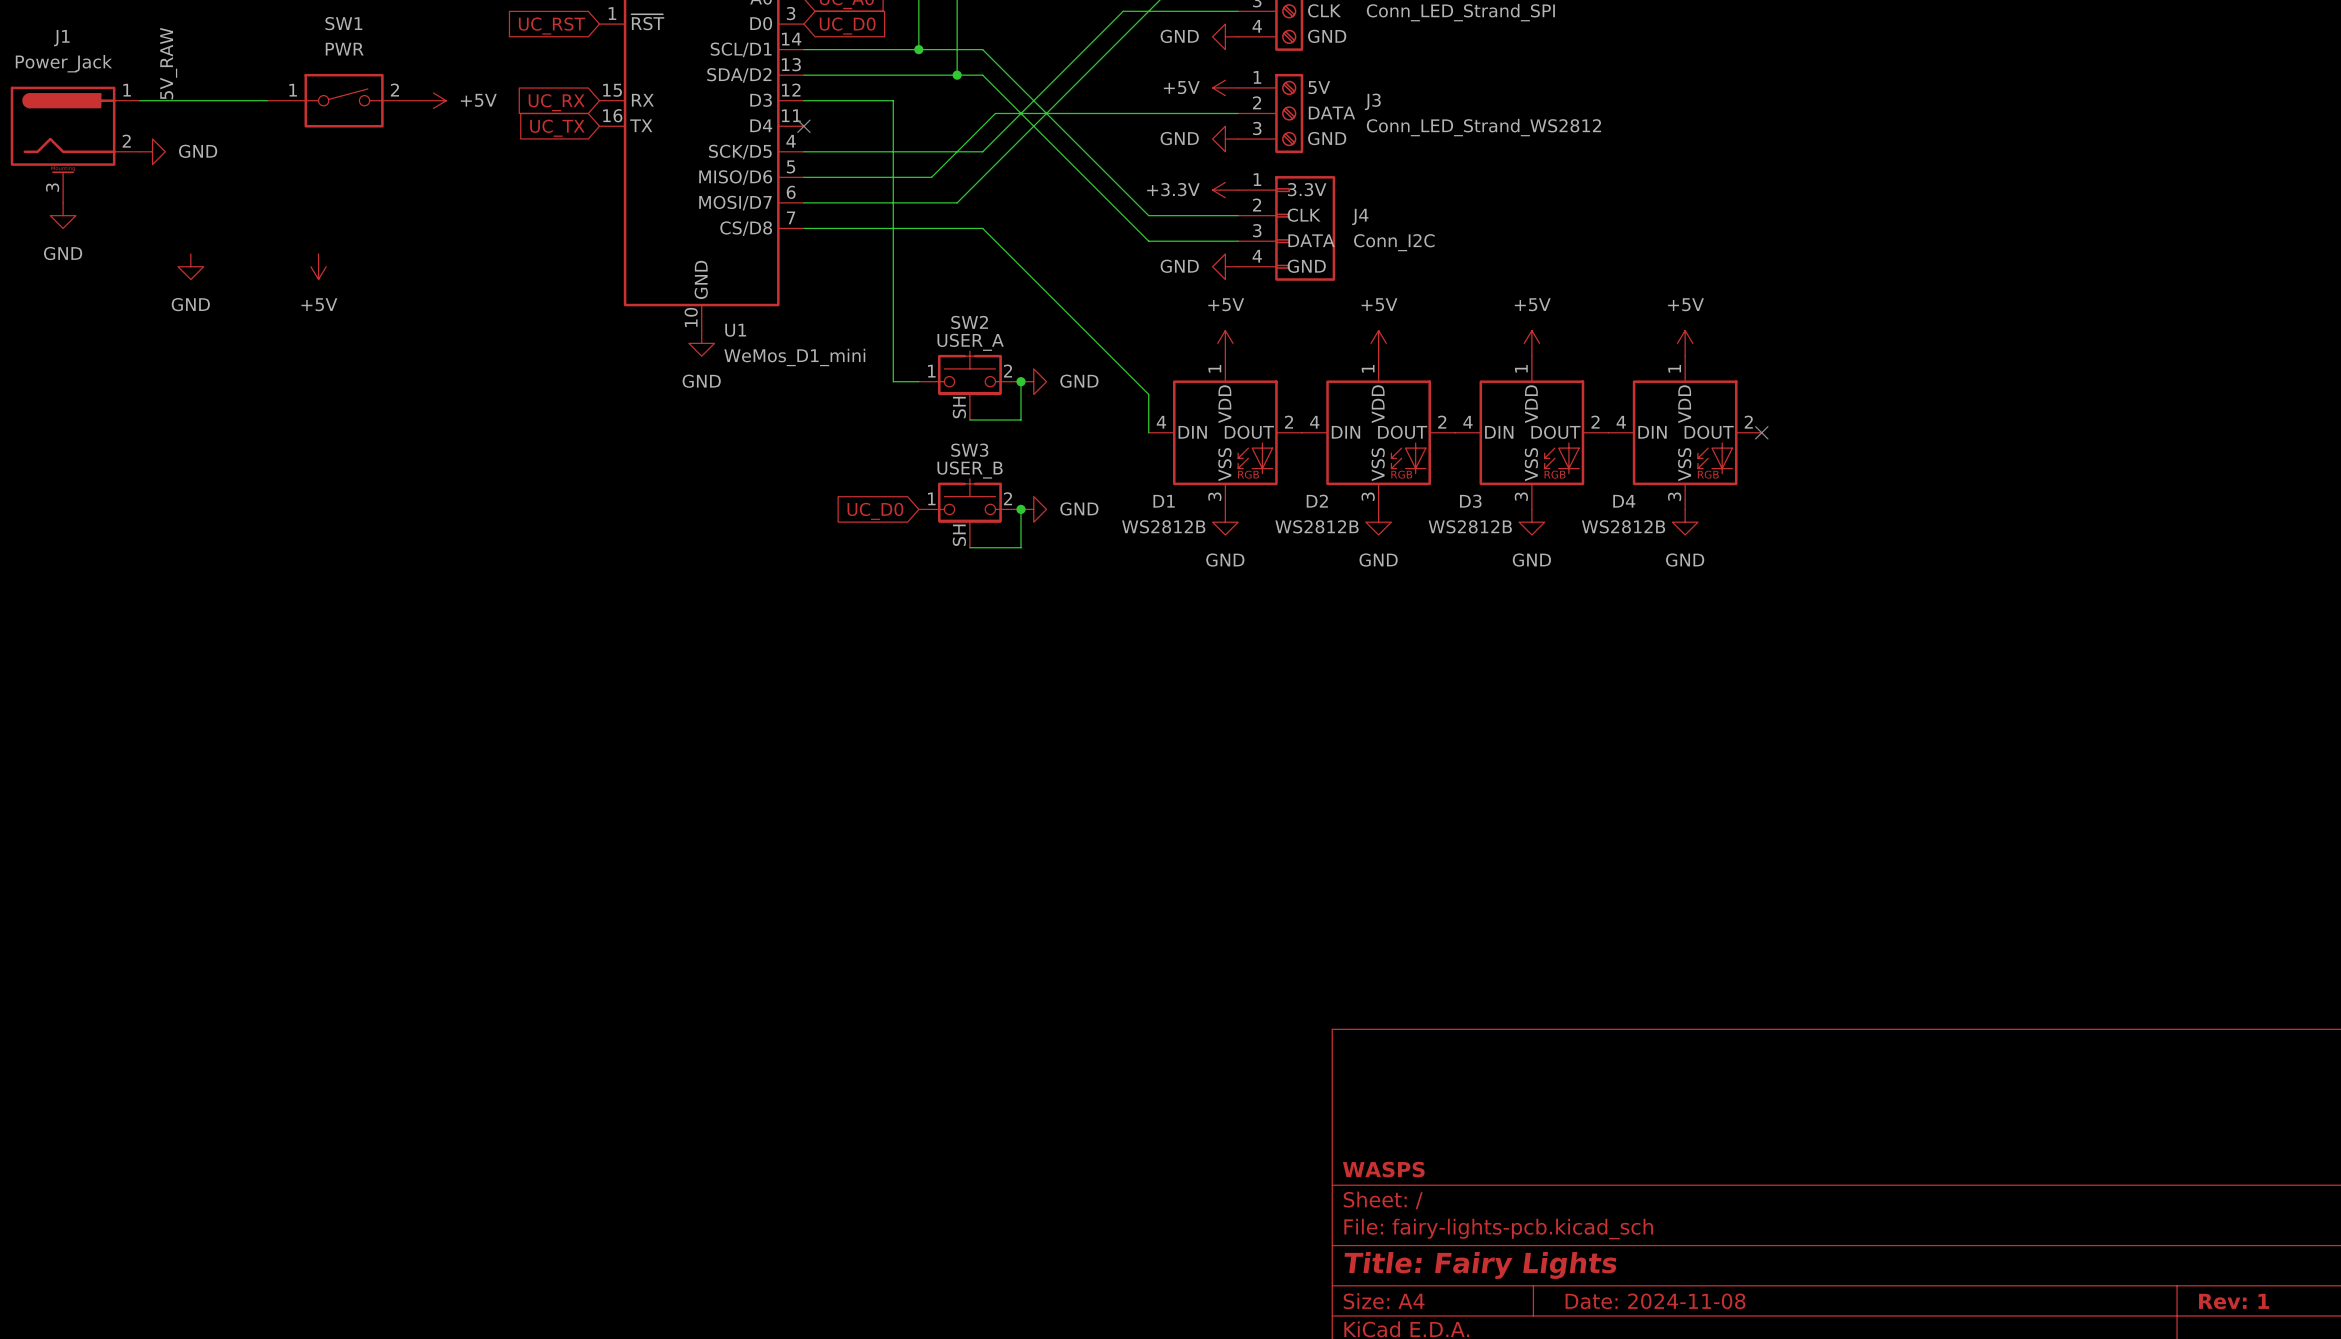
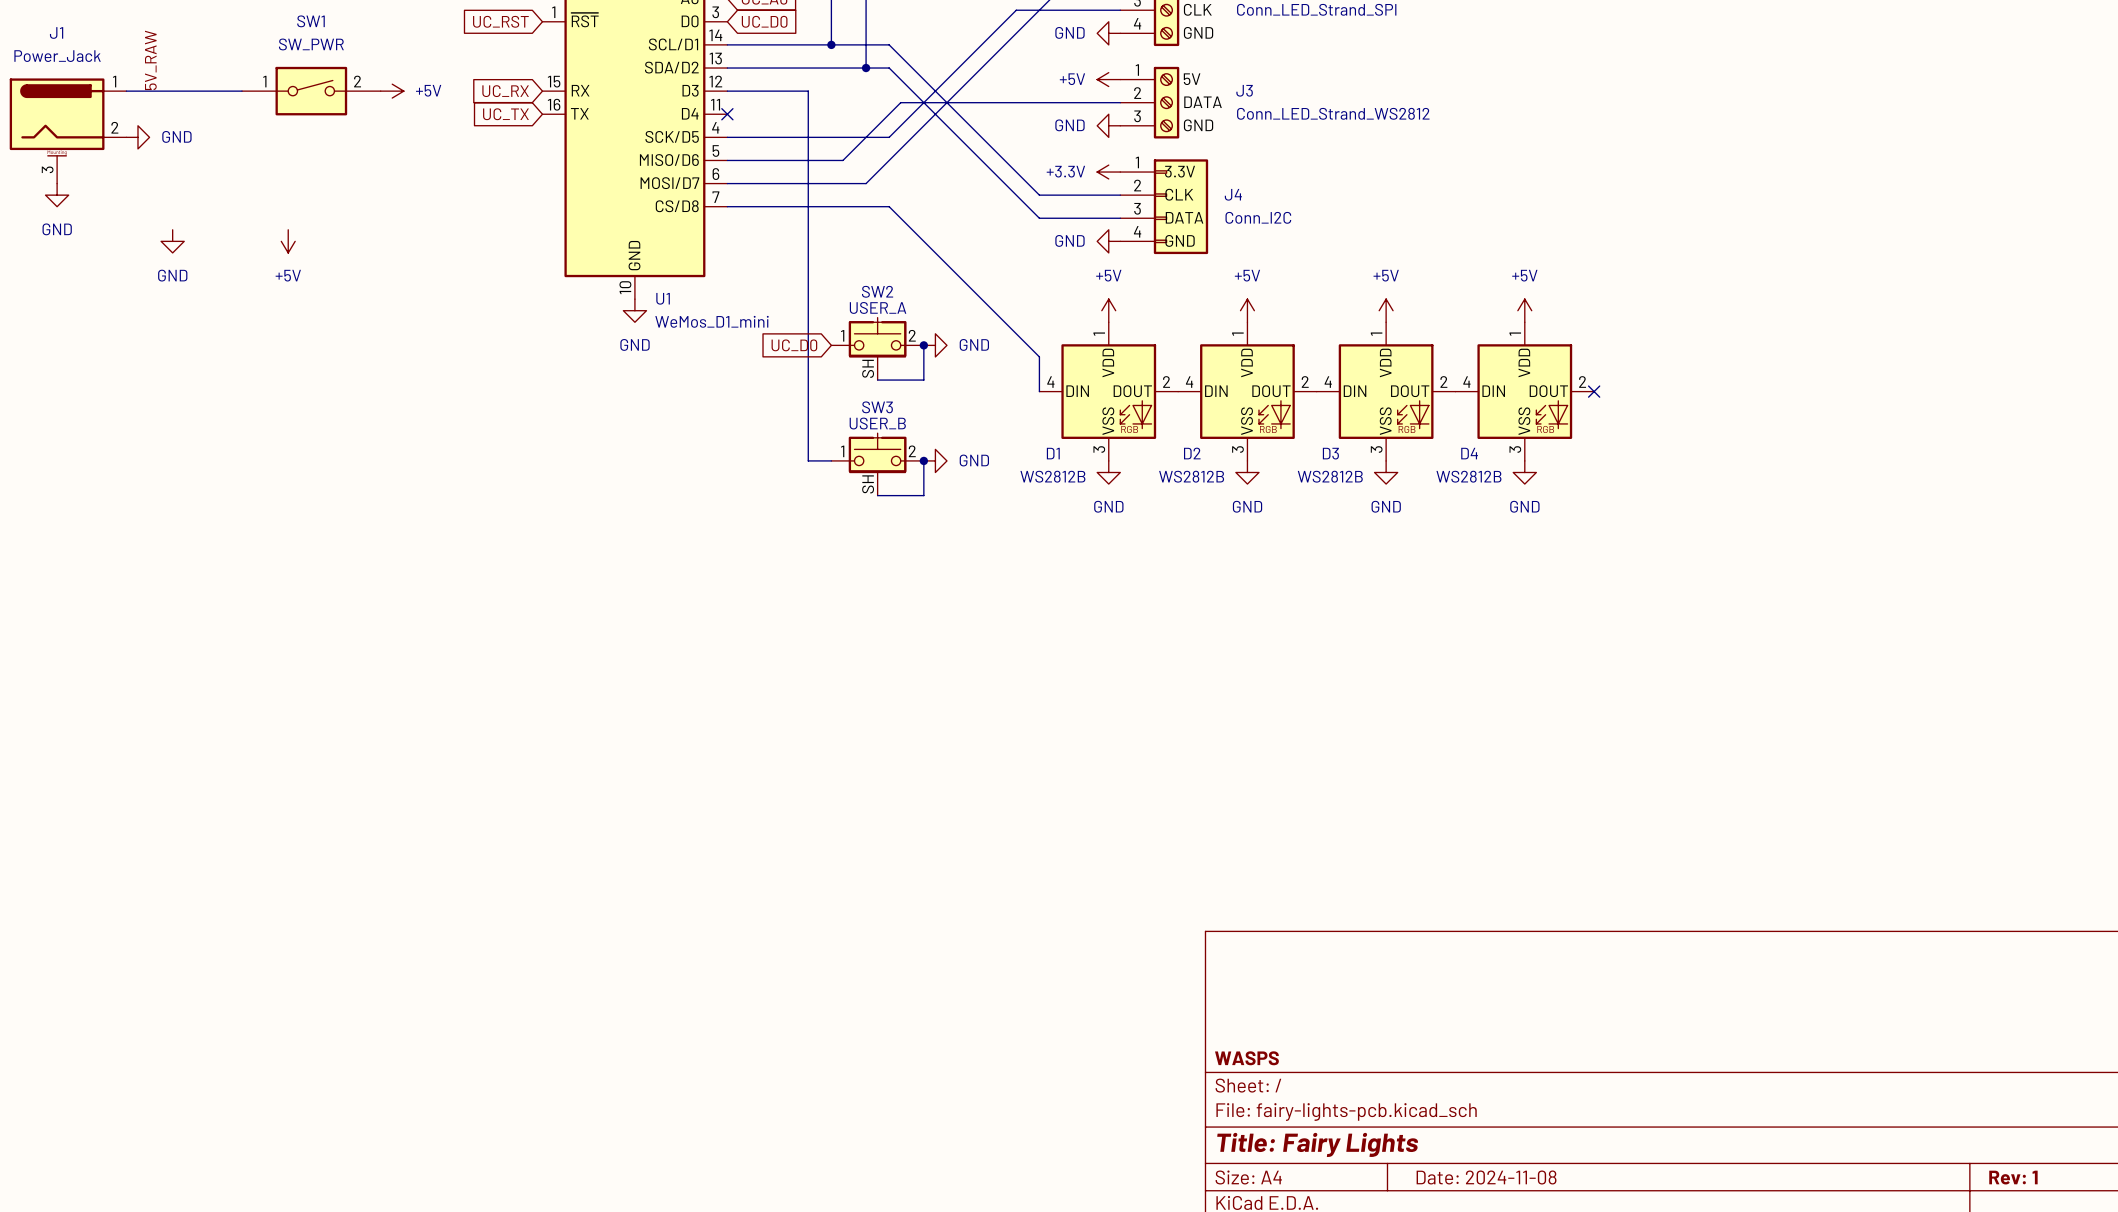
SW1 value: PWR (344, 49) -> SW_PWR (311, 44)
wire: (893, 381) (918, 381) -> (808, 345) (808, 460) (831, 460)
global label position: UC_D0 (875, 511) -> UC_D0 (794, 345)

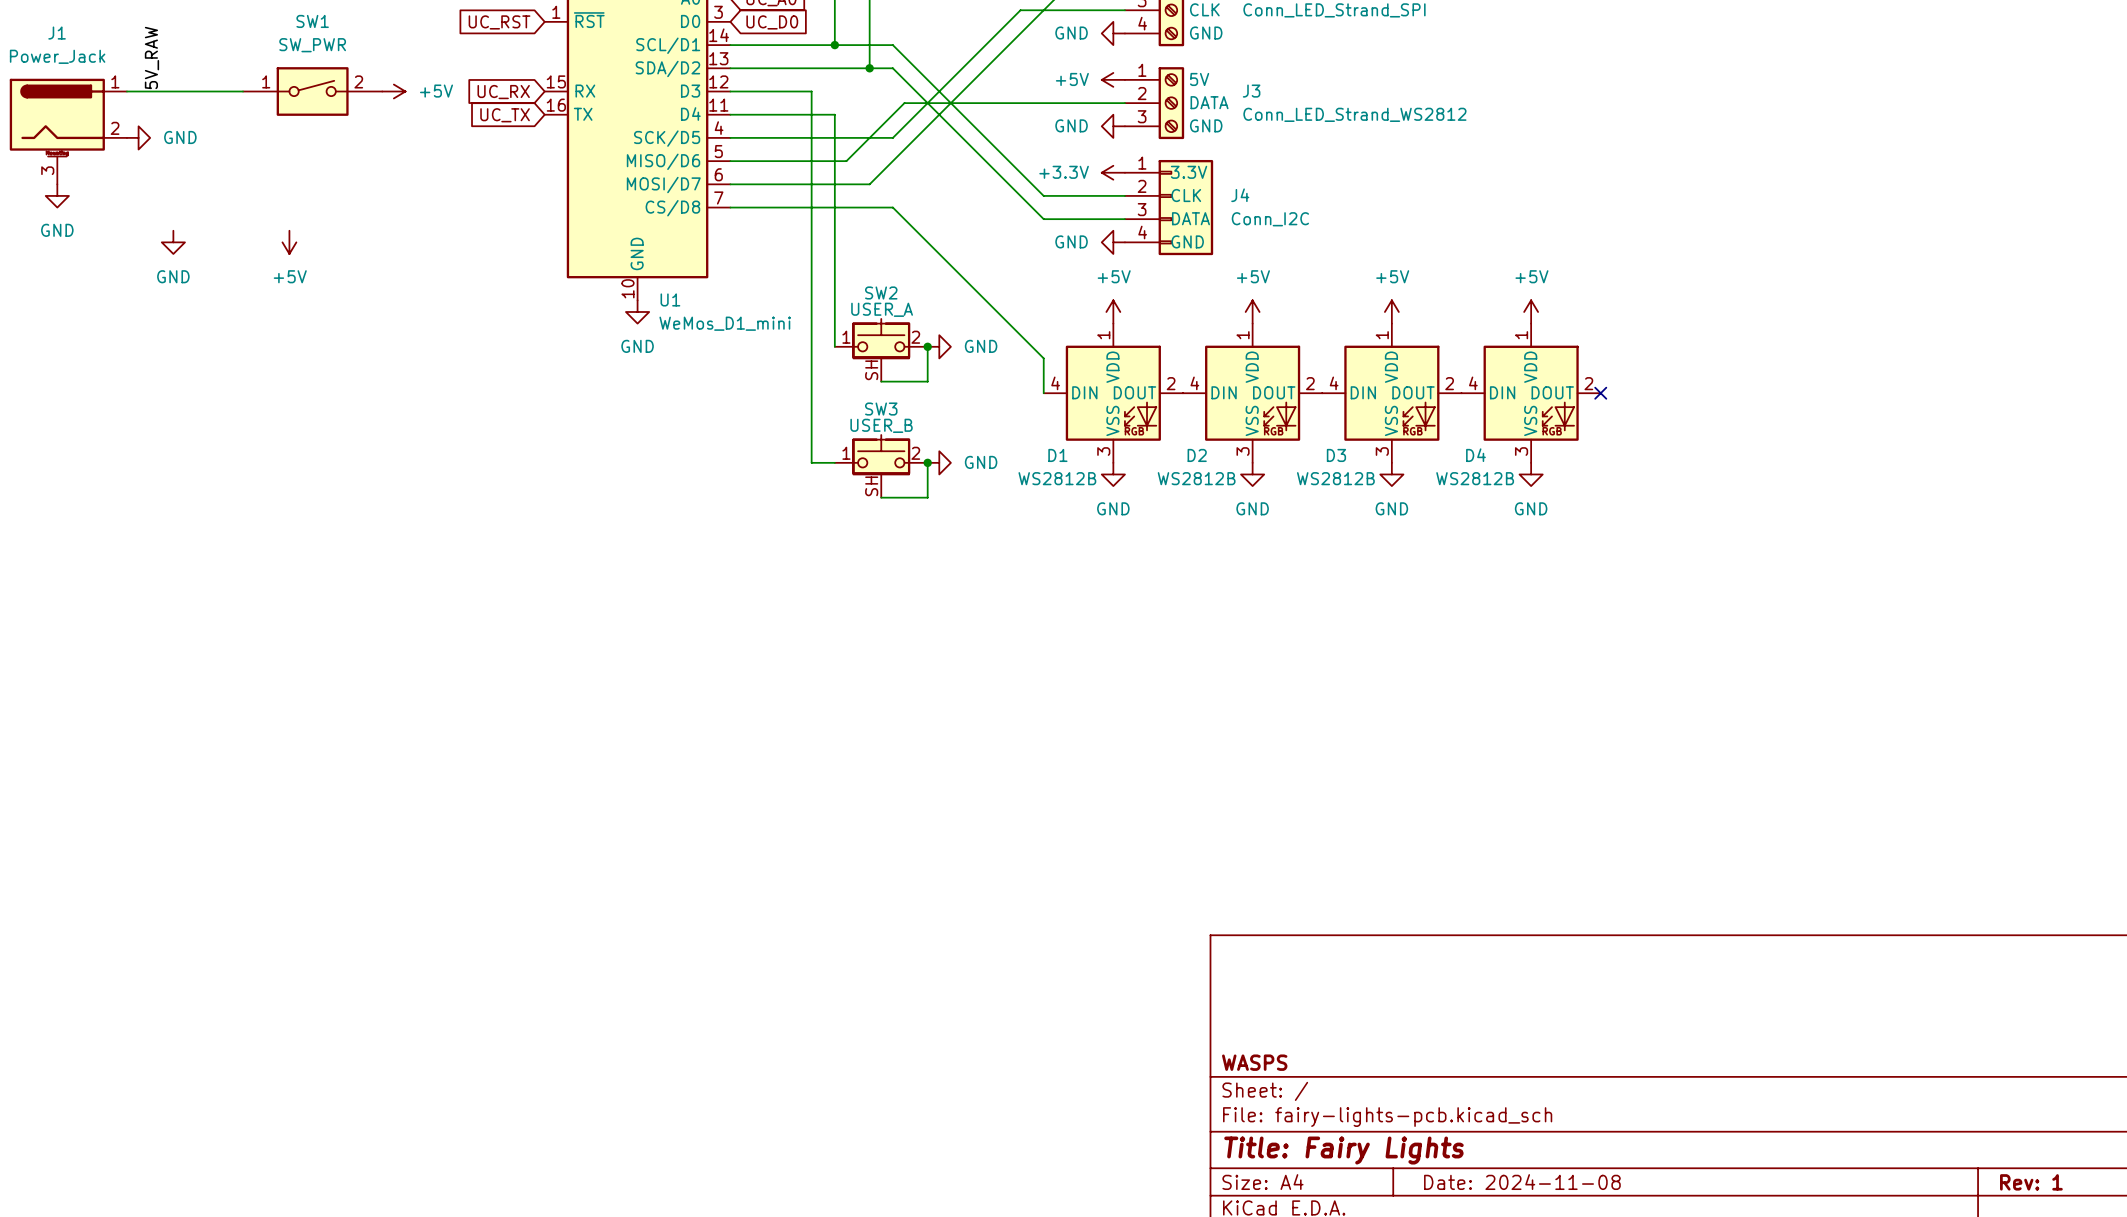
wire: none -> (730, 114) (834, 114) (834, 346)
no-connect mark: (727, 114) -> none
global label: UC_D0 (794, 345) -> none

